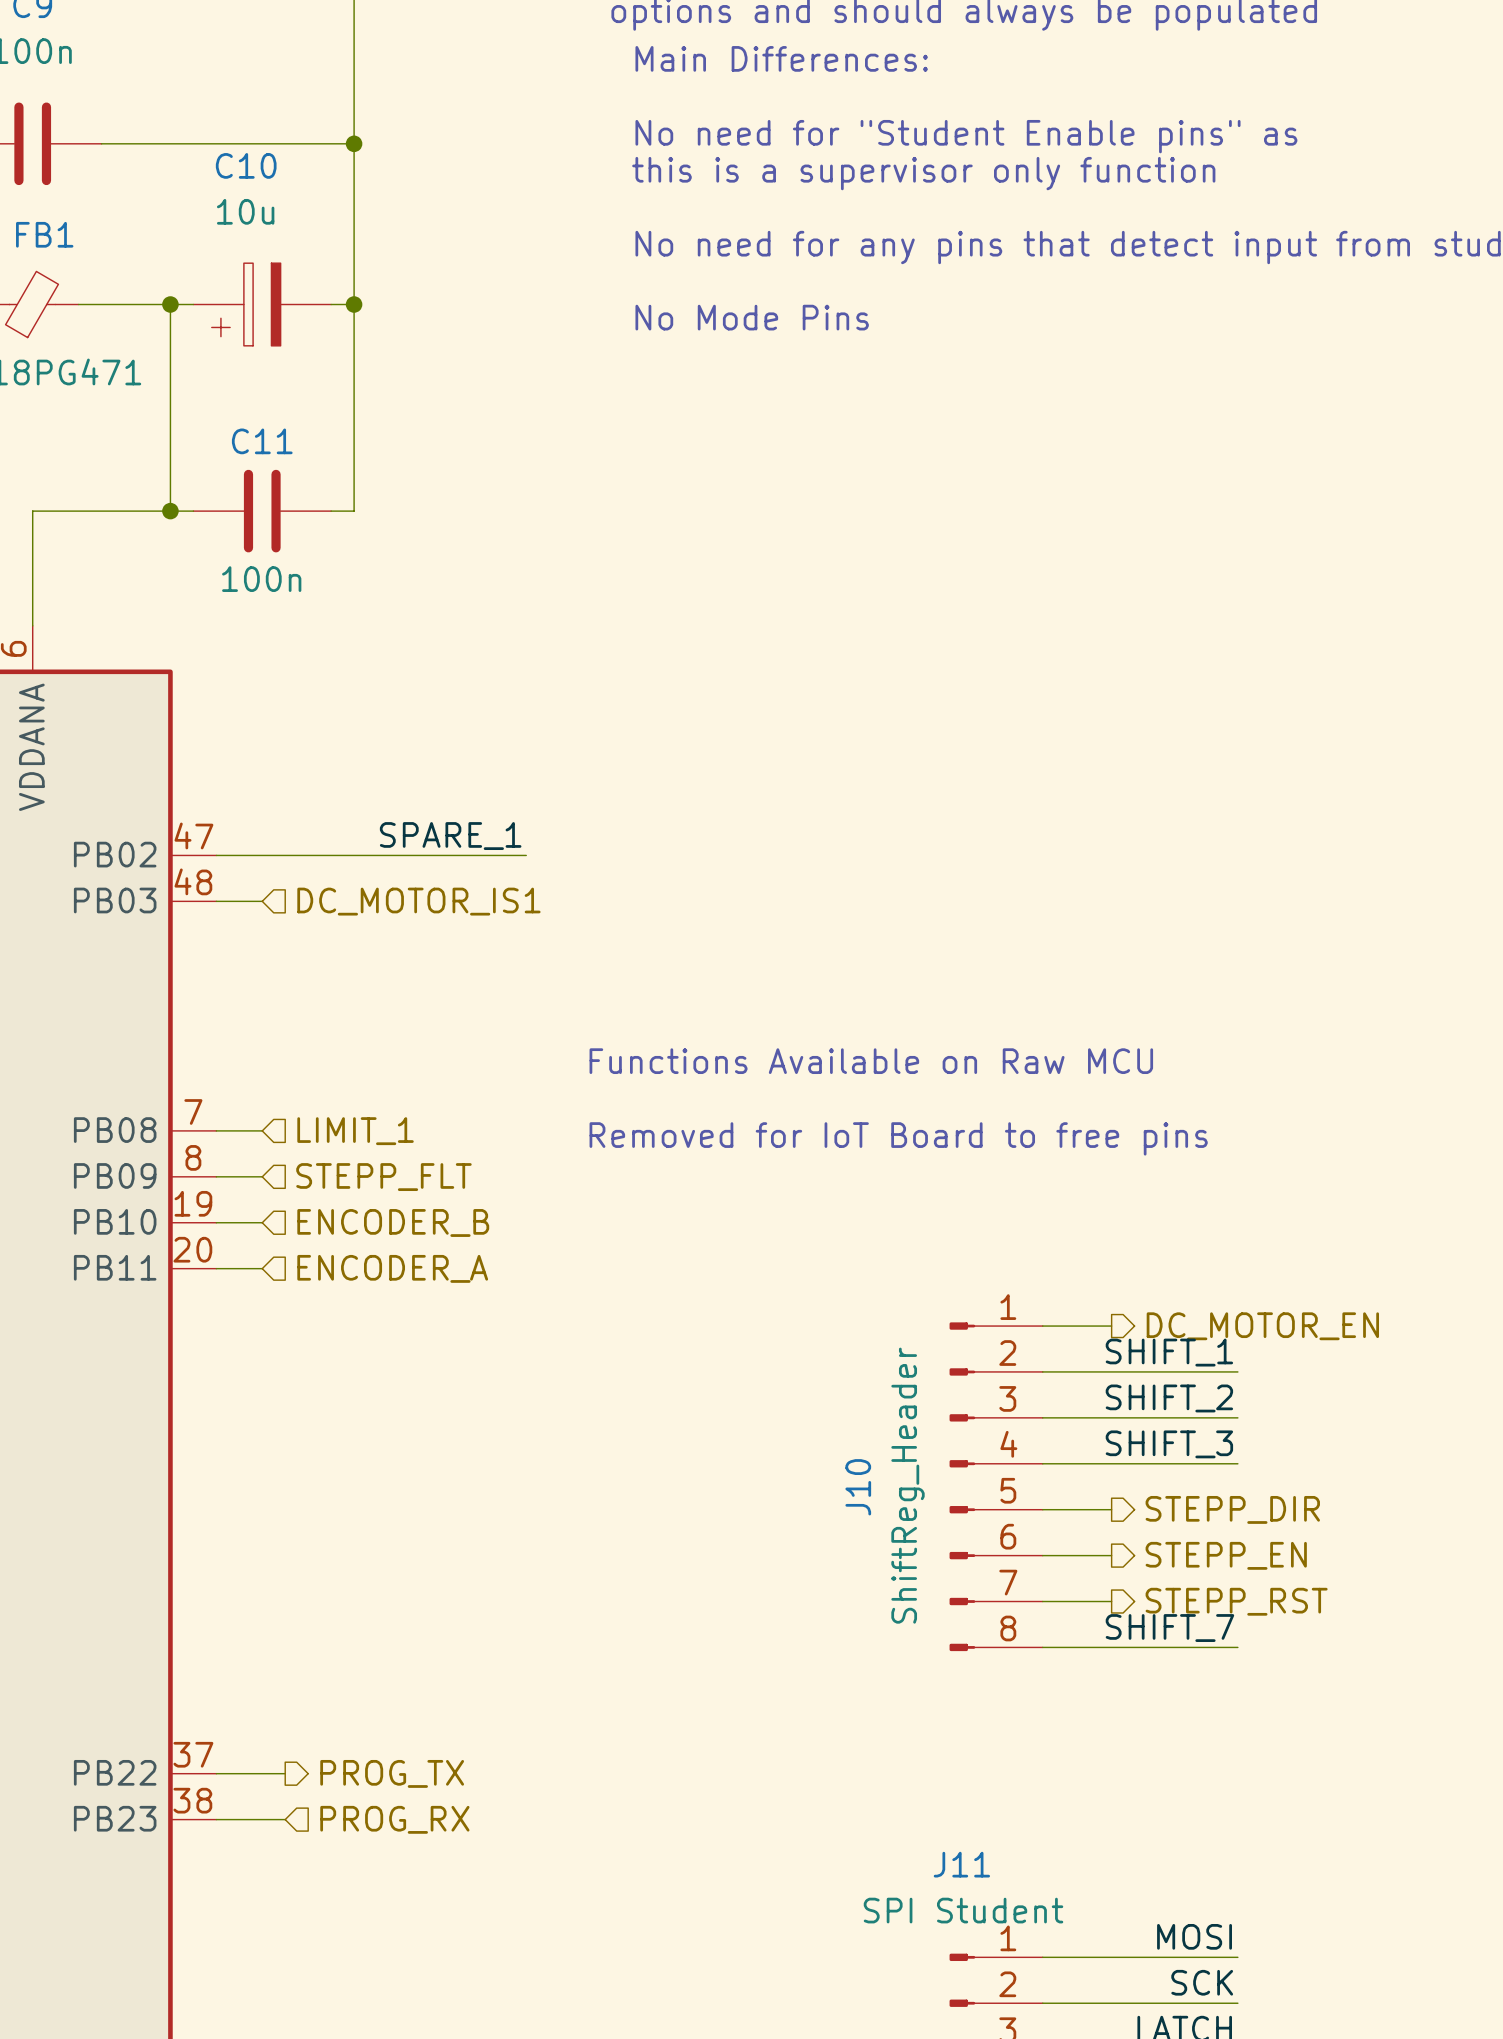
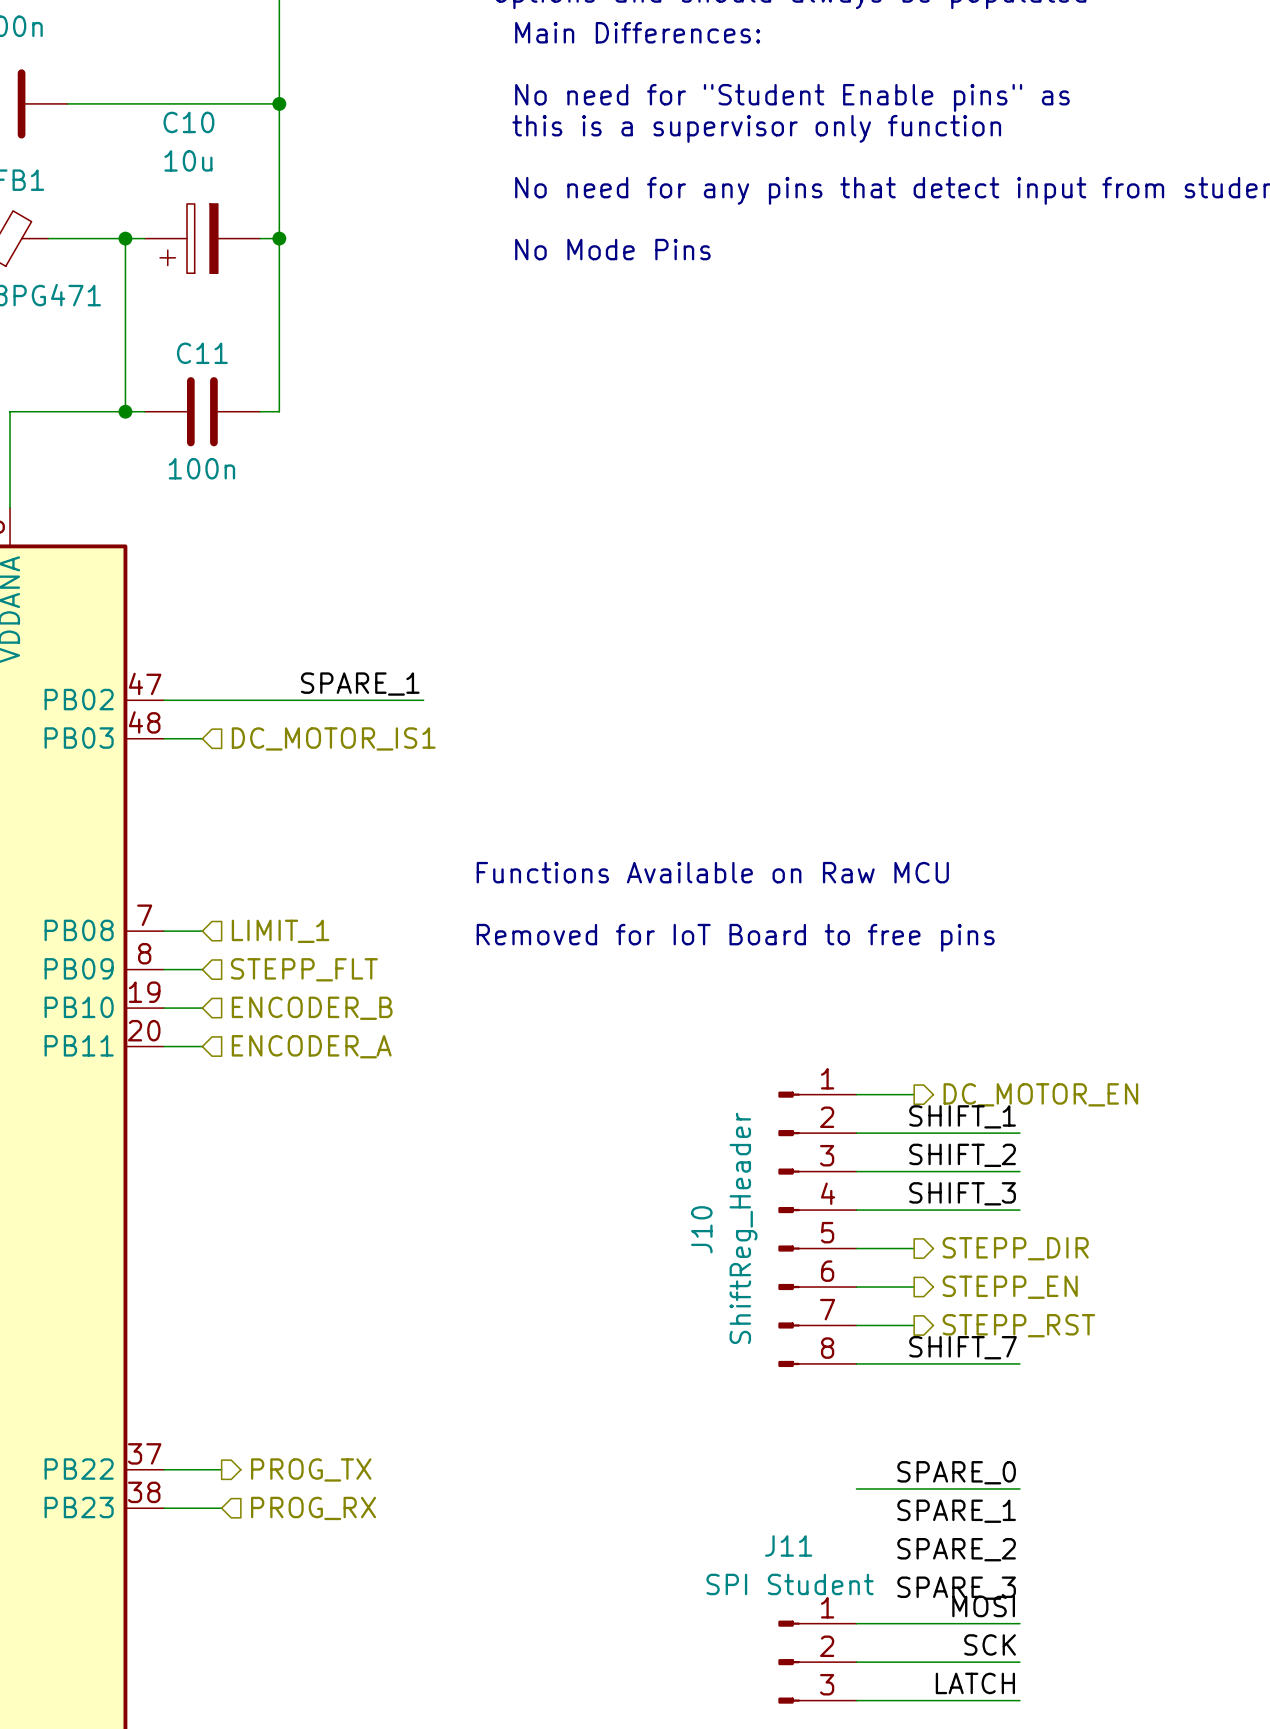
label: none -> SPARE_0 (956, 1472)
wire: none -> (856, 1488) (1019, 1488)
label: none -> SPARE_1 (956, 1511)
label: none -> SPARE_2 (956, 1549)
label: none -> SPARE_3 (956, 1588)

